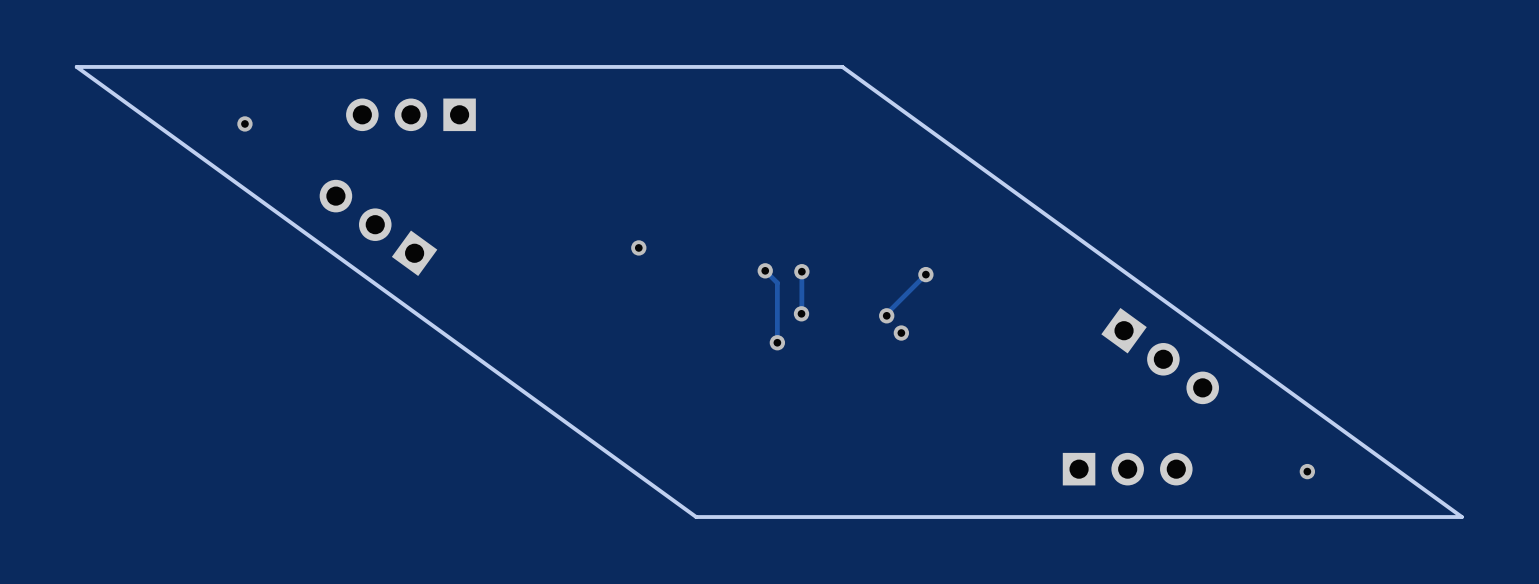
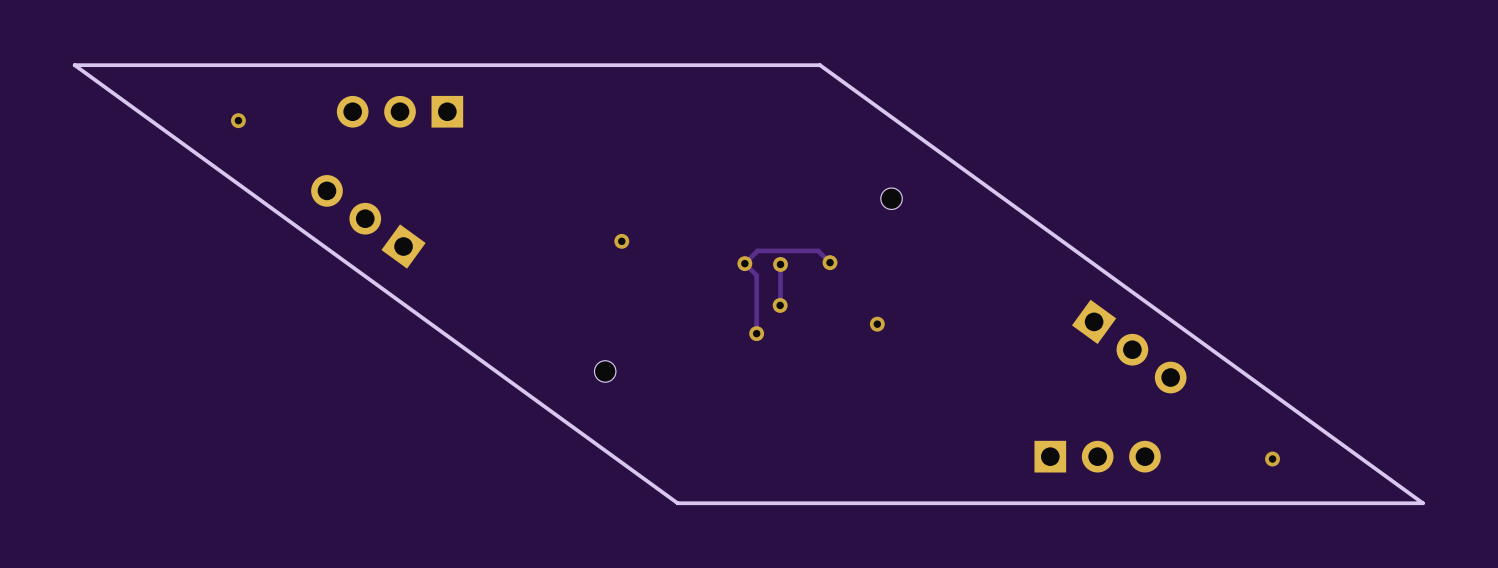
part: none -> (891, 198)
track: none -> (830, 262) (818, 250) (757, 250) (744, 263)
via: none -> (830, 262)
track: (925, 274) (886, 315) -> none
via: (925, 274) -> none
via: (886, 315) -> none
part: none -> (605, 371)

